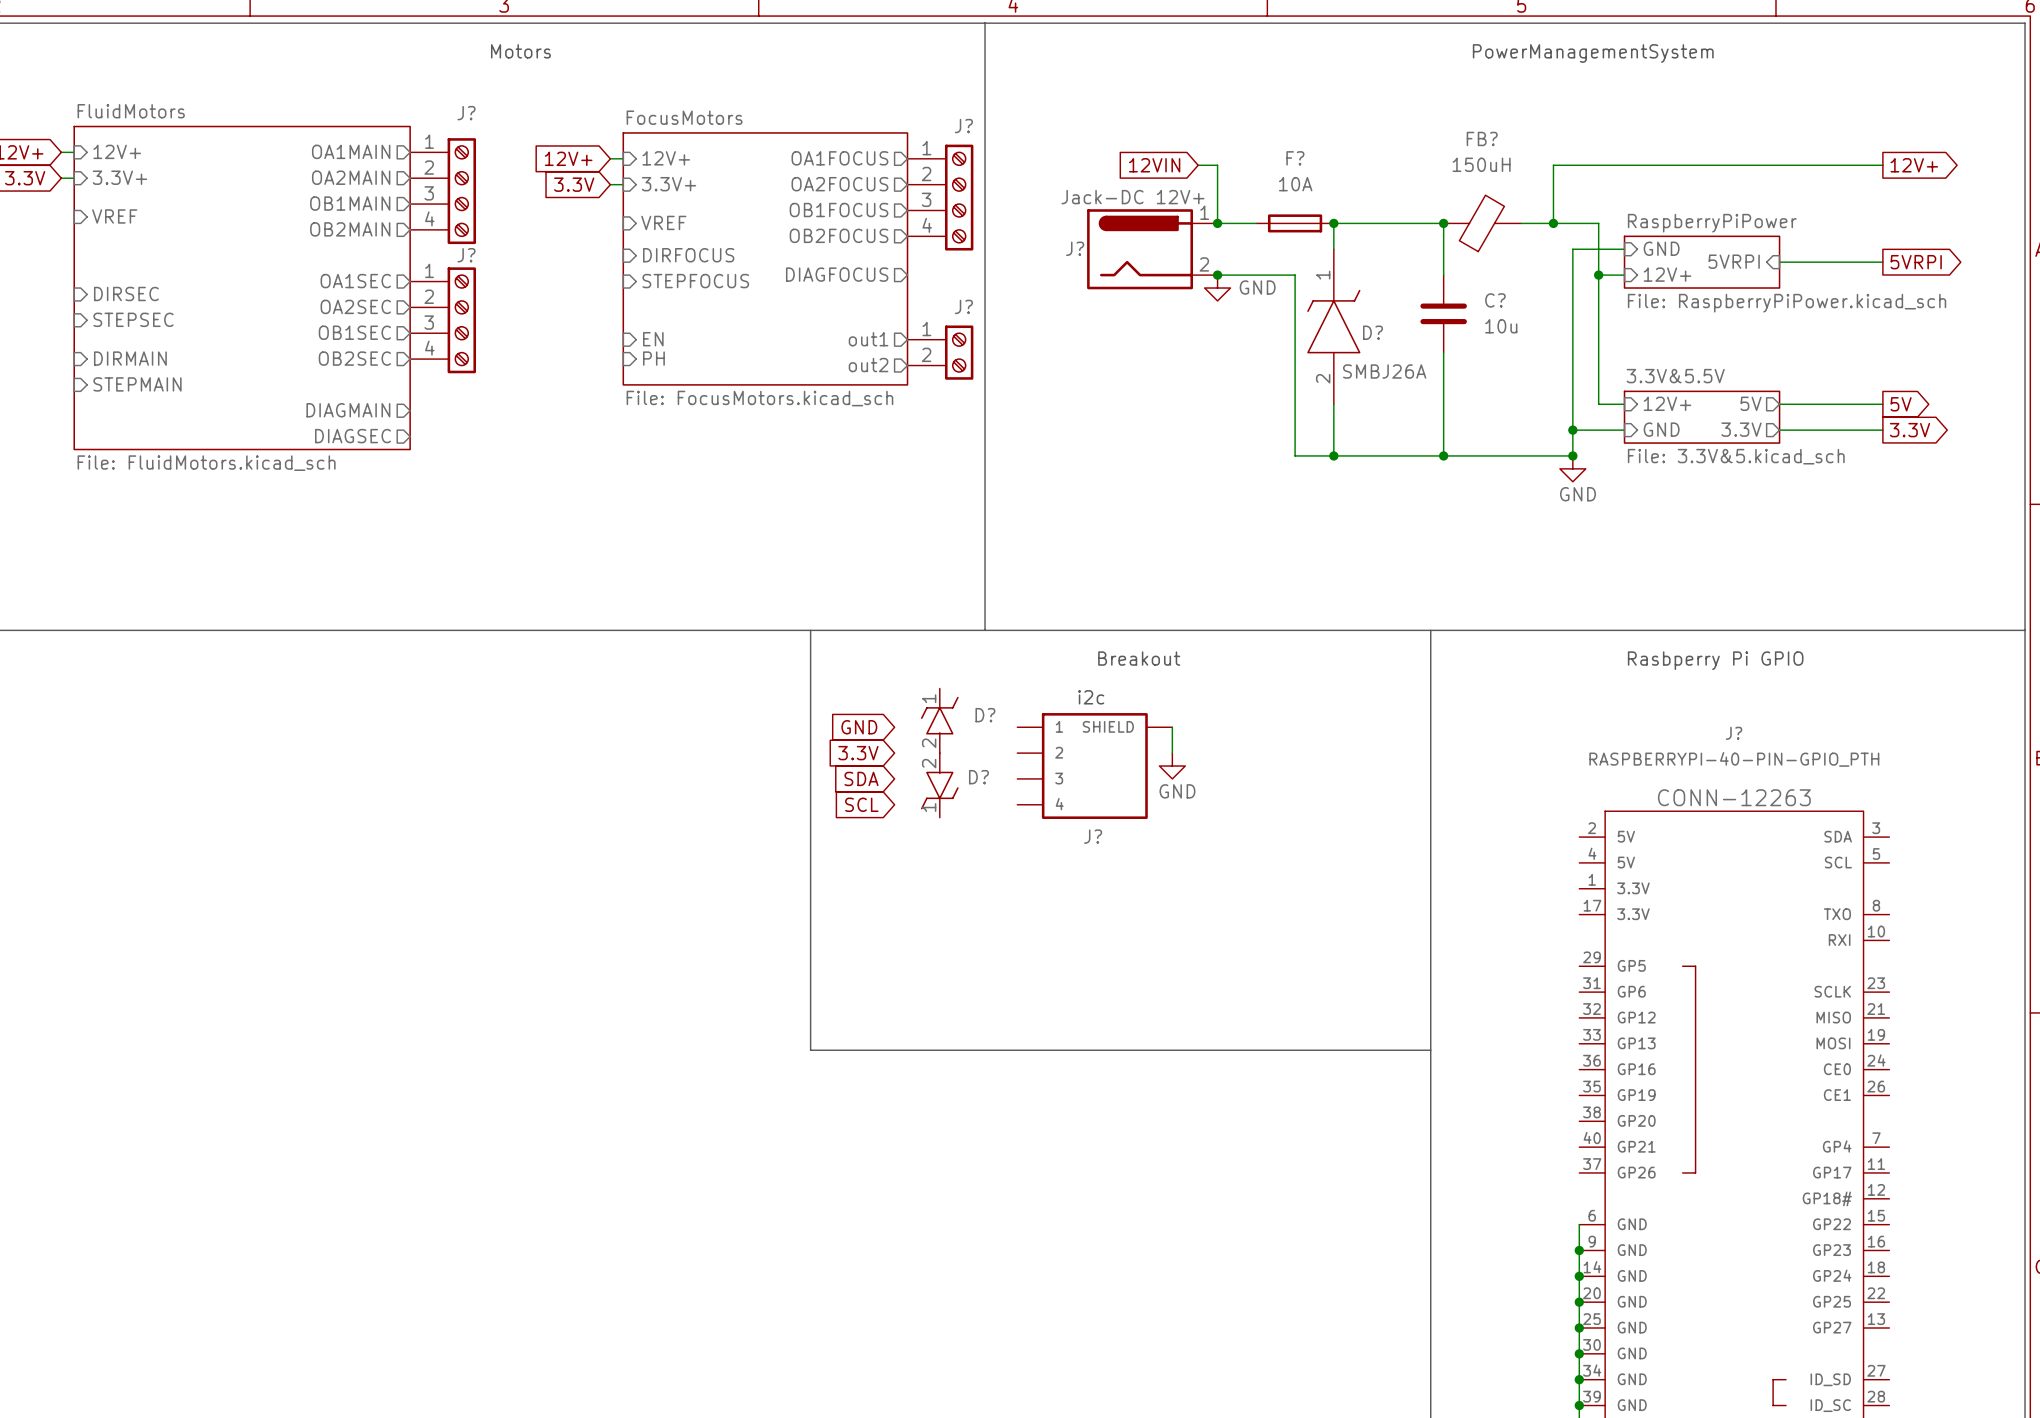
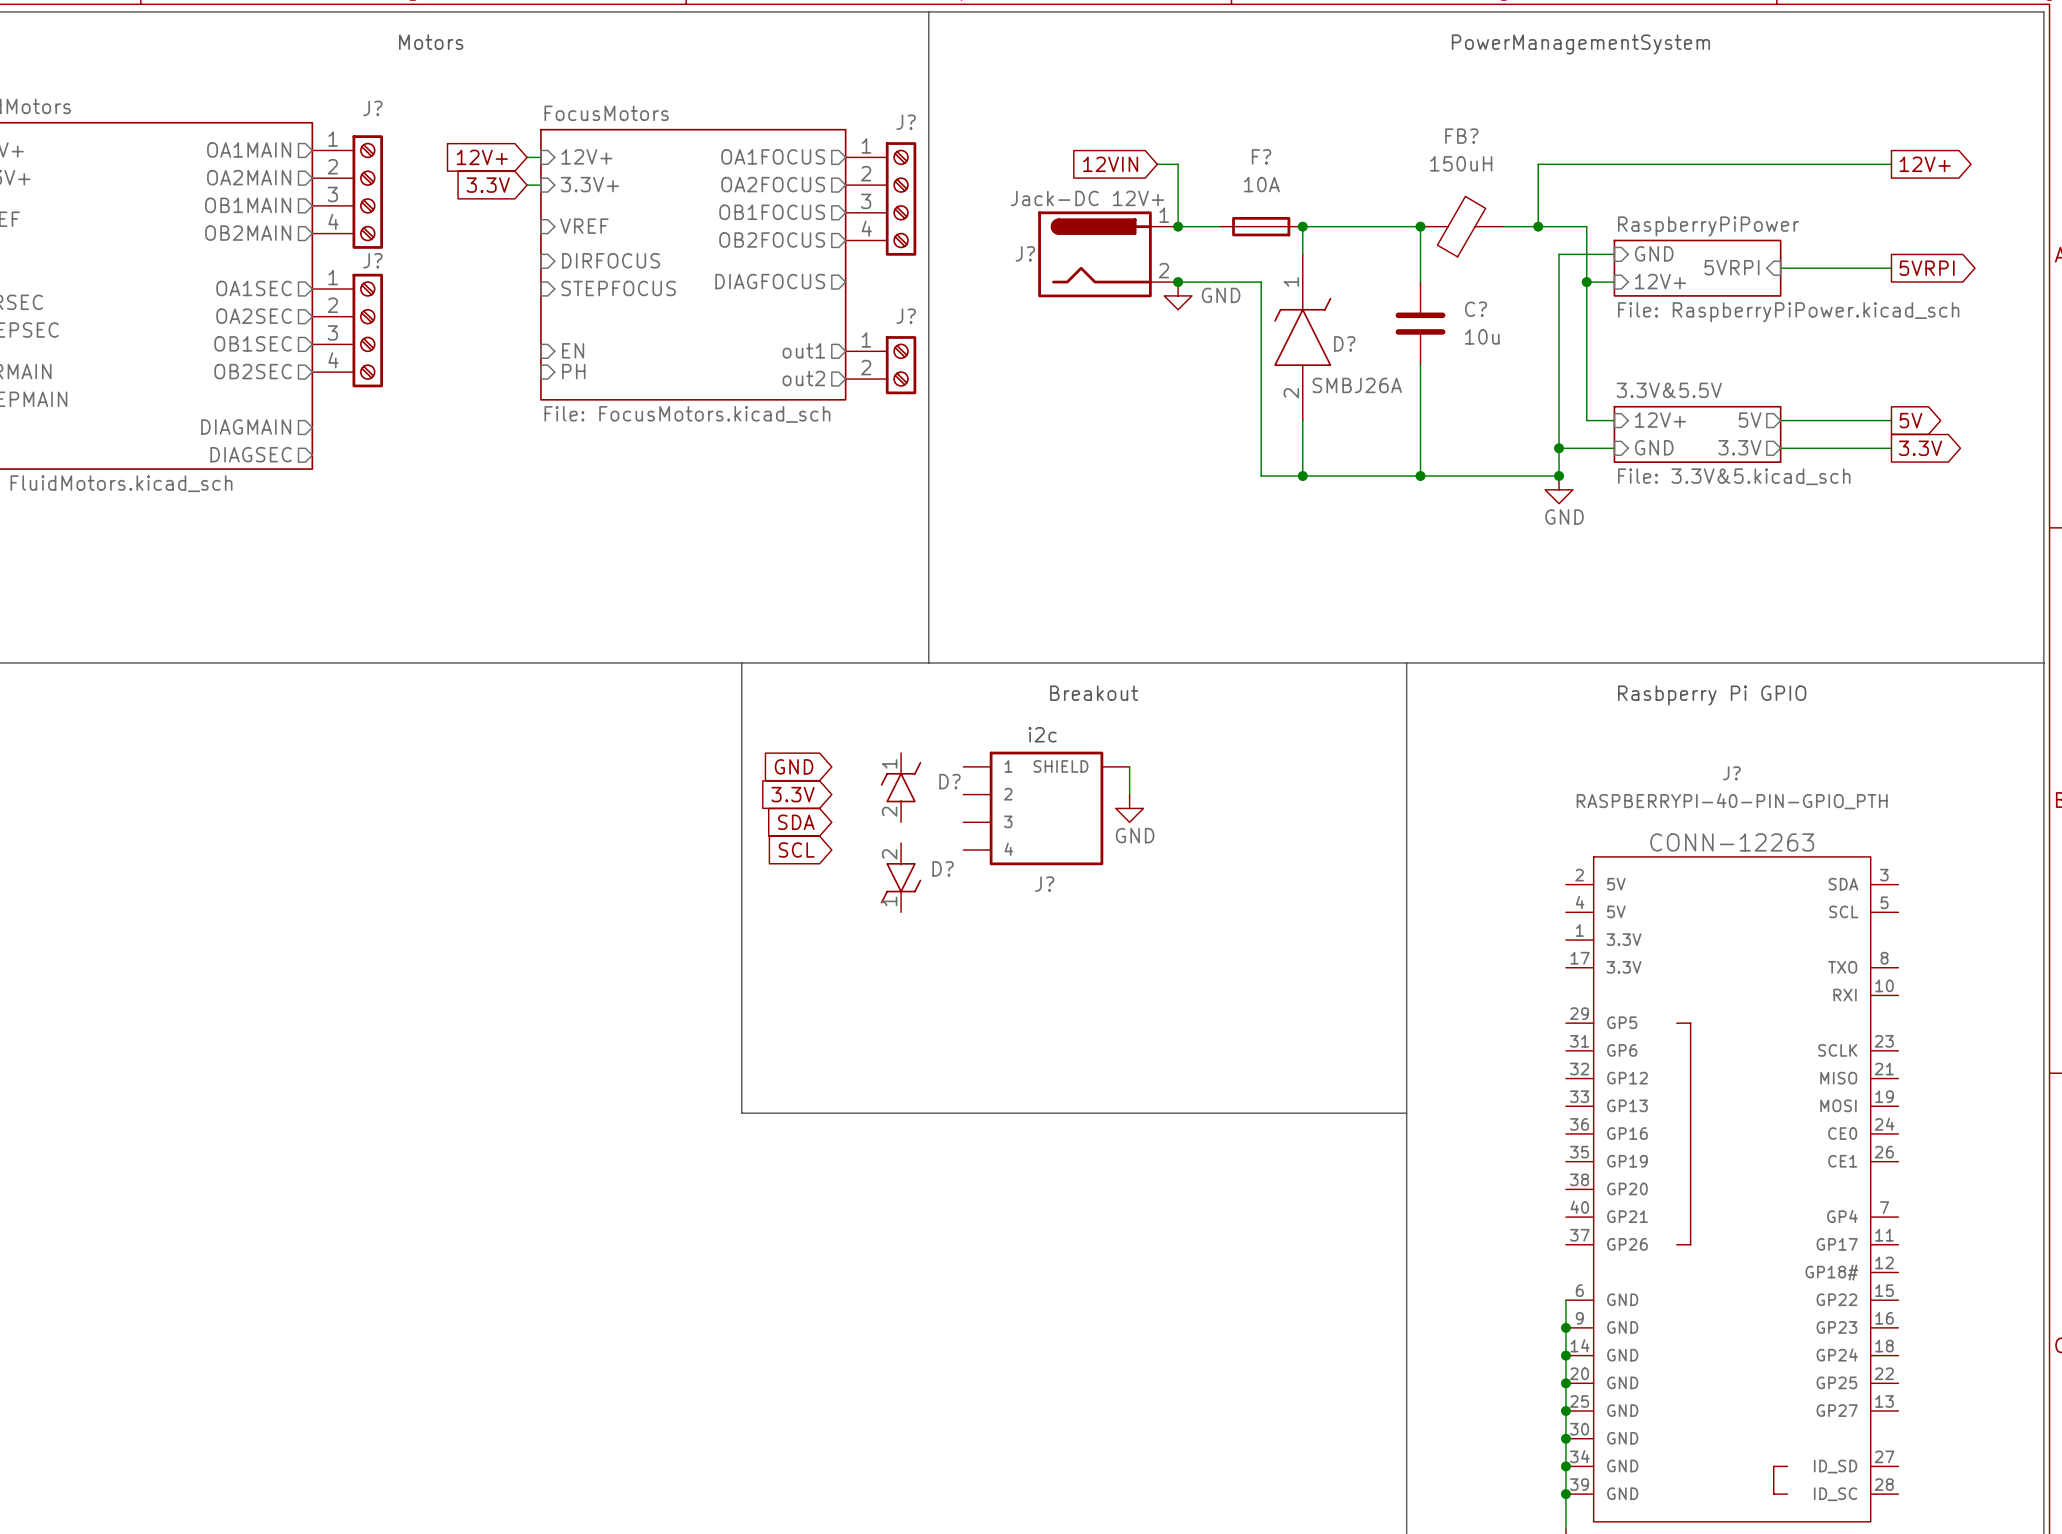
D?: (939, 720) -> none
D?: none -> (901, 787)
D?: (939, 785) -> none
D?: none -> (901, 877)

